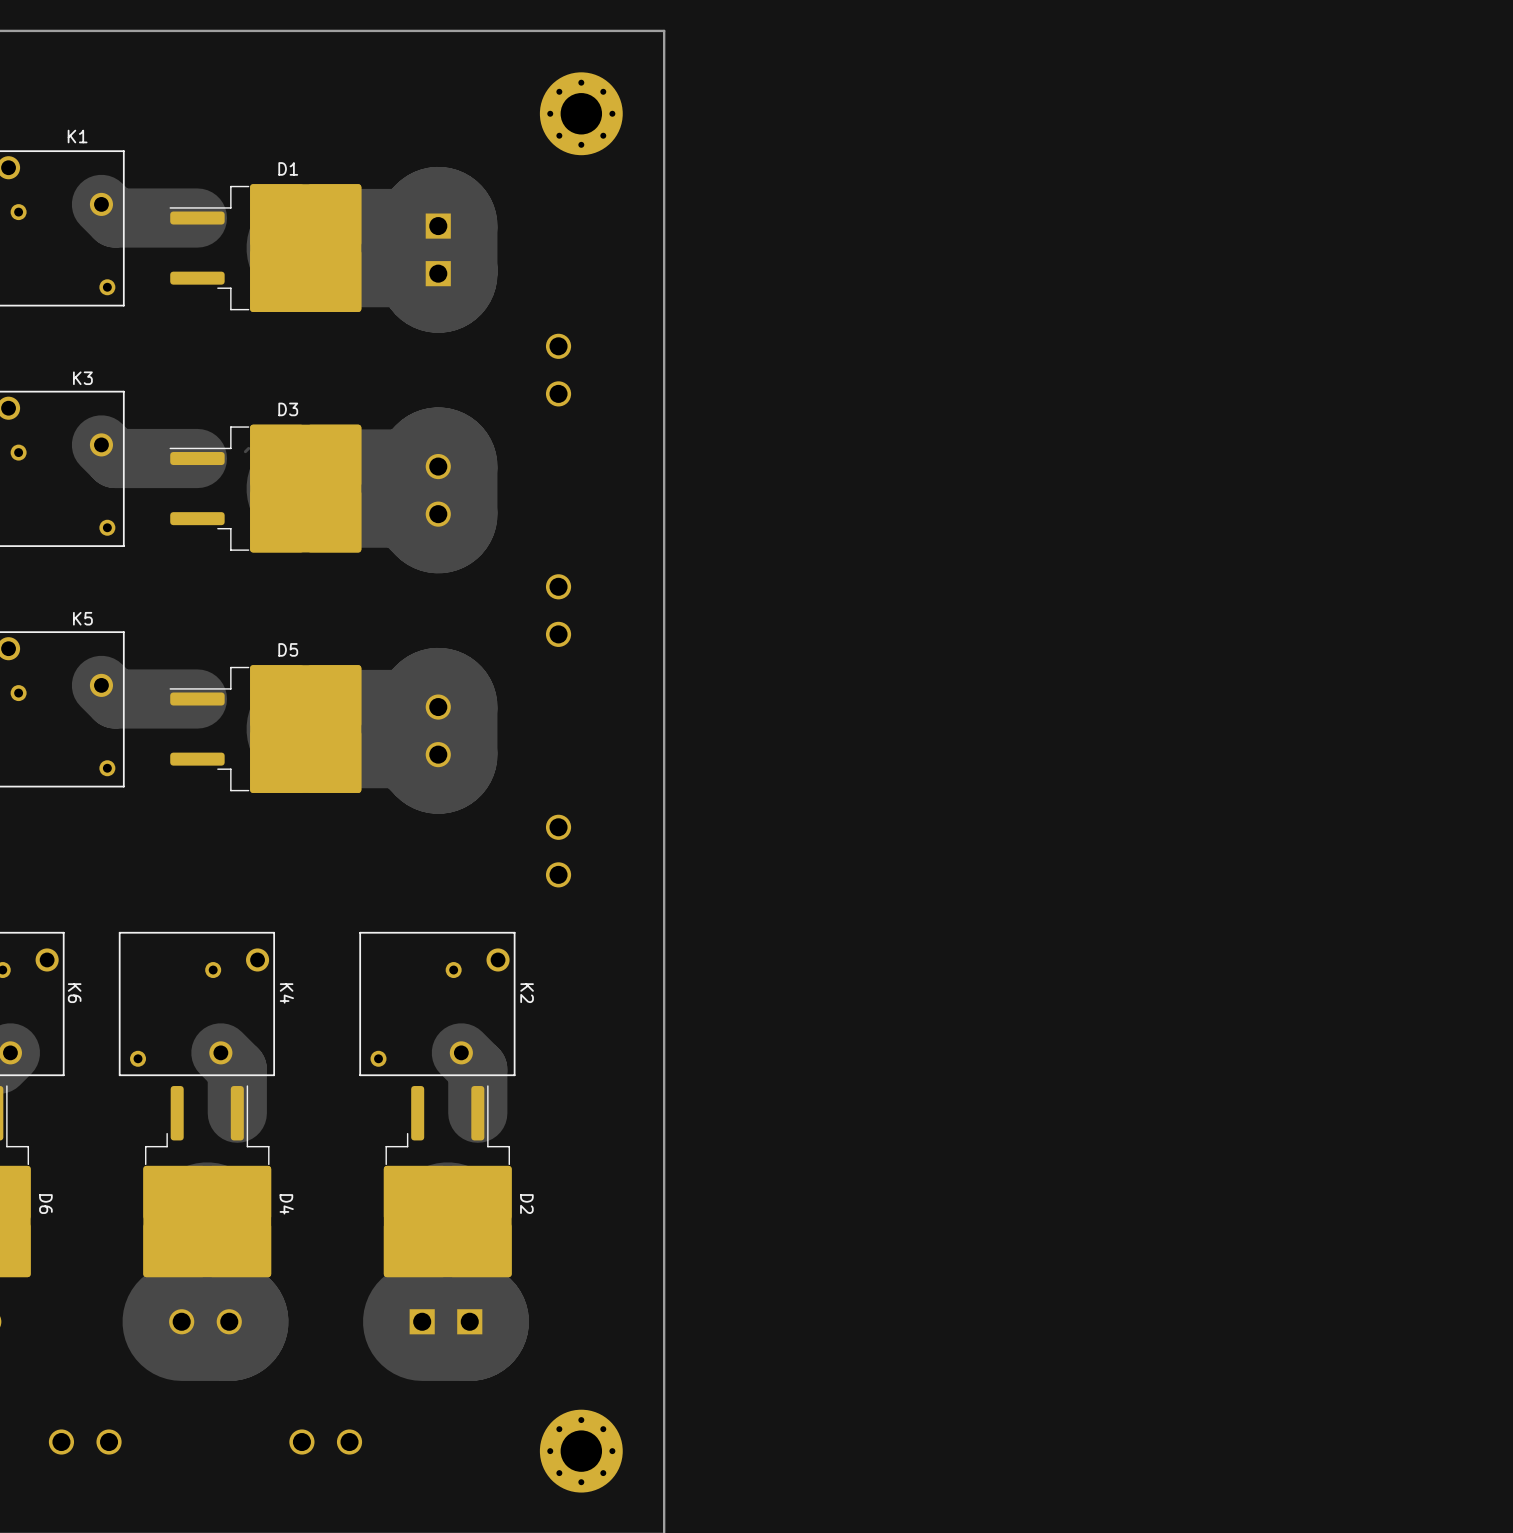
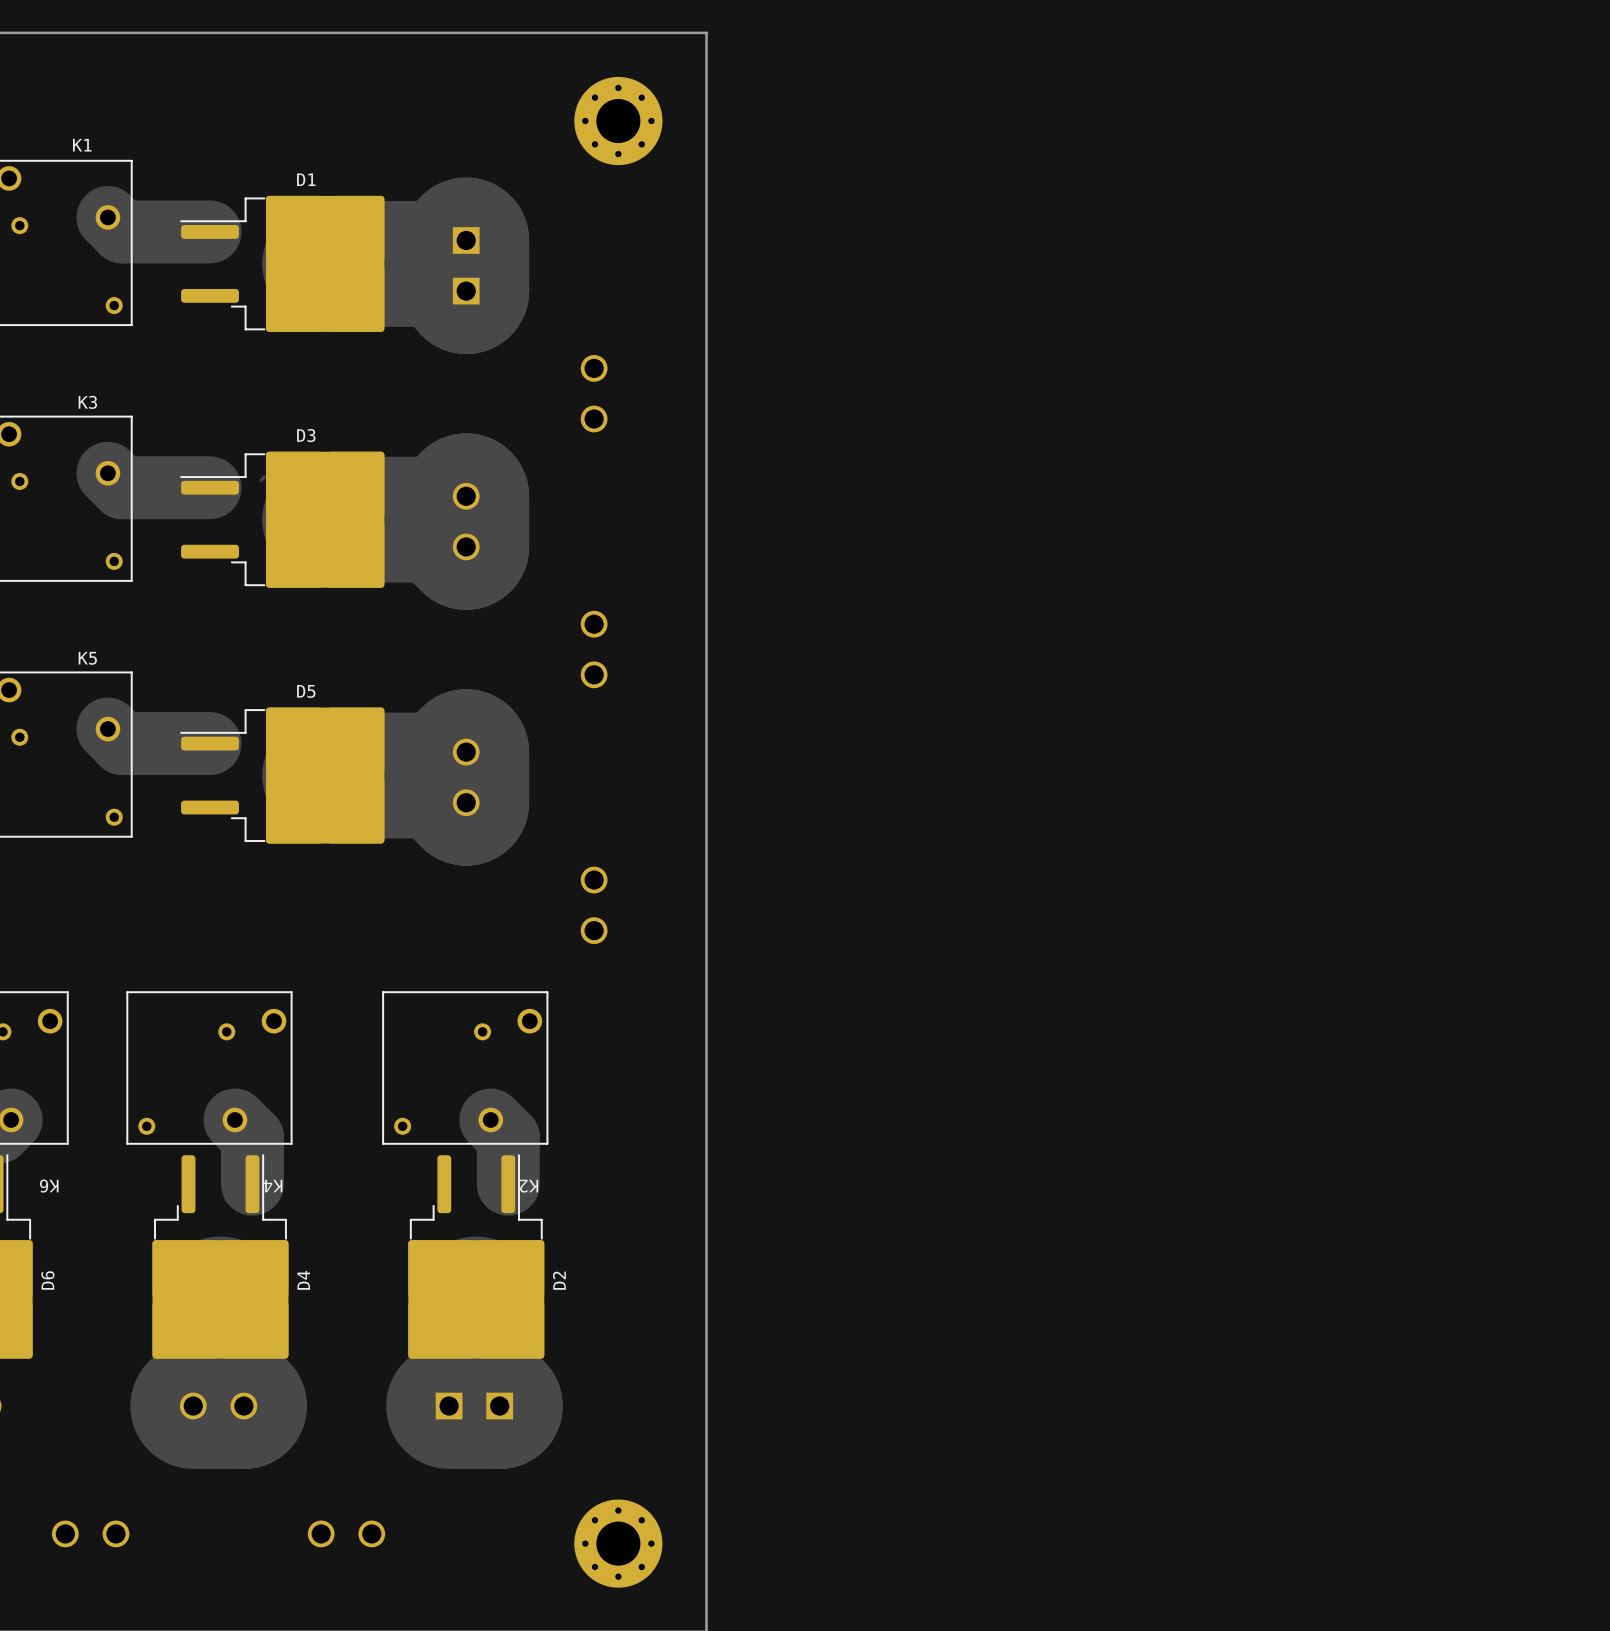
K6 name rotation: 0° (74, 993) -> 90° clockwise (49, 1186)
K6 name position: K6 (74, 993) -> K6 (49, 1186)
K4 name rotation: 0° (286, 993) -> 90° clockwise (272, 1186)
K4 name position: K4 (286, 993) -> K4 (272, 1186)
K2 name rotation: 0° (527, 993) -> 90° clockwise (529, 1186)
K2 name position: K2 (527, 993) -> K2 (529, 1186)
D6 name rotation: 0° (45, 1204) -> 180° (47, 1280)
D4 name rotation: 0° (286, 1204) -> 180° (303, 1280)
D2 name rotation: 0° (526, 1204) -> 180° (559, 1280)

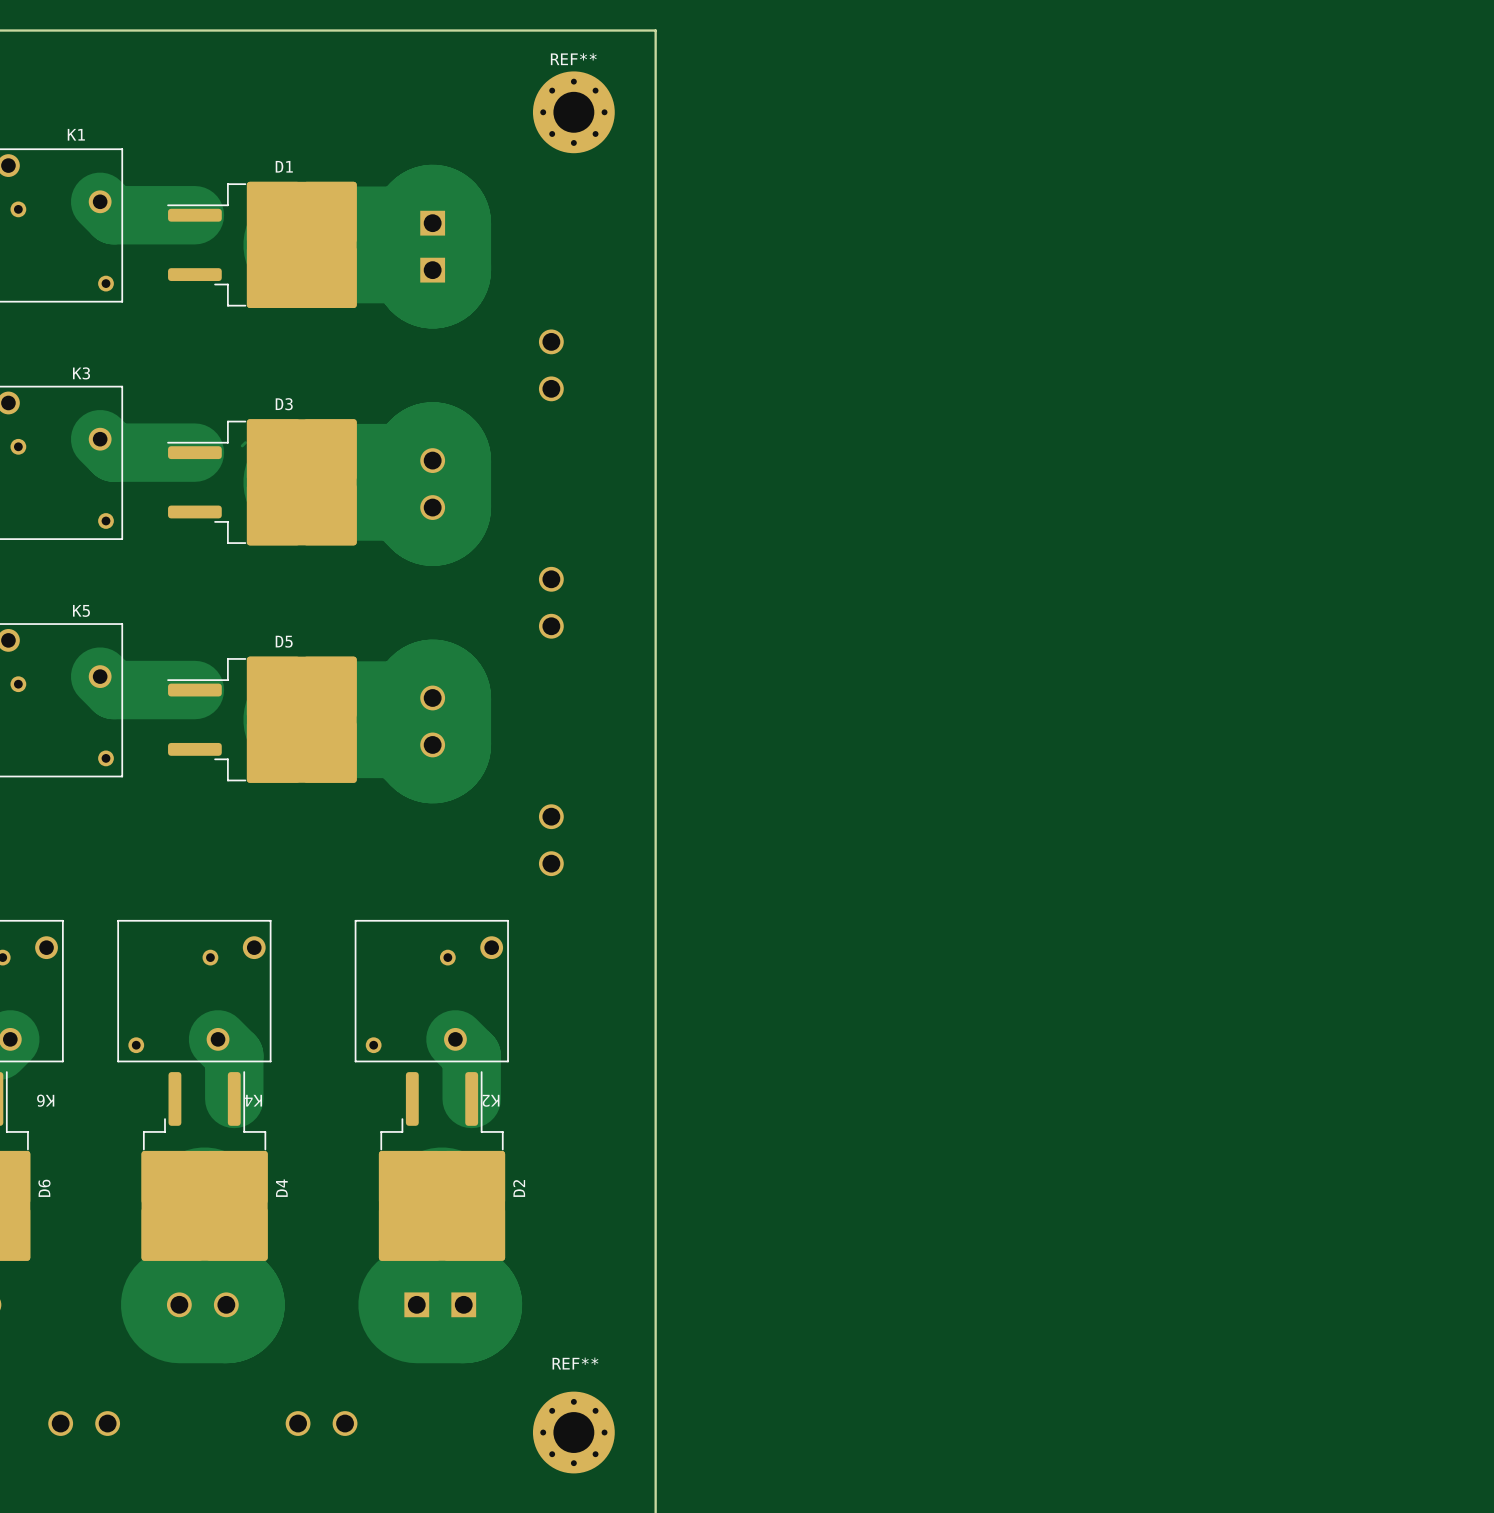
REF** name: none -> REF** (573, 59)
REF** name: none -> REF** (575, 1363)

